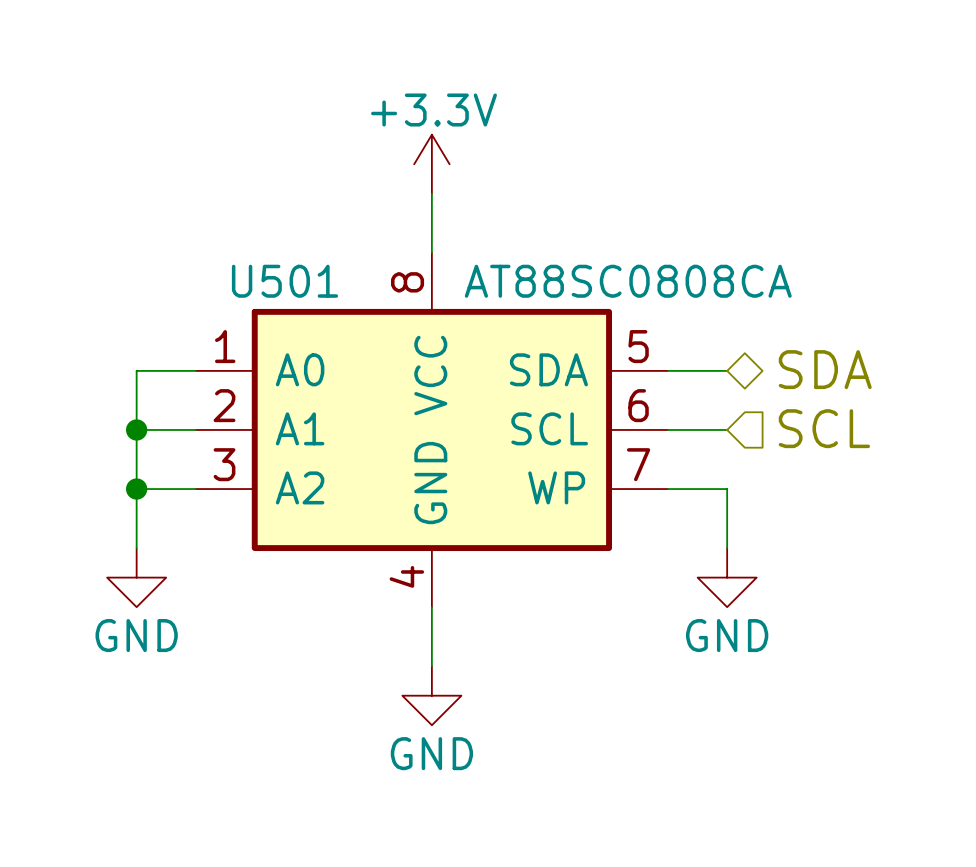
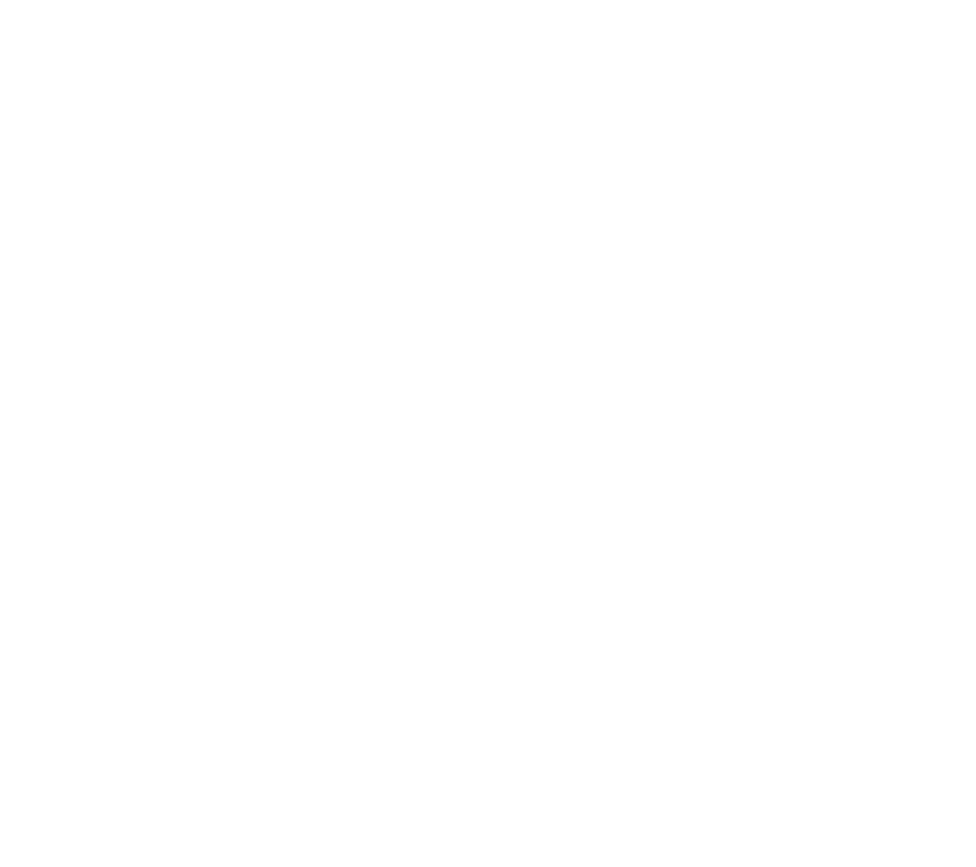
power symbol: +3.3V (431, 164) -> none
wire: (431, 193) (431, 252) -> none
hierarchical label: SDA (825, 369) -> none
wire: (195, 370) (136, 370) (136, 548) -> none
wire: (668, 370) (727, 370) -> none
hierarchical label: SCL (824, 428) -> none
wire: (136, 429) (195, 429) -> none
junction: (136, 429) -> none
U501: AT88SC0808CA (431, 429) -> none
wire: (668, 429) (727, 429) -> none
wire: (136, 489) (195, 489) -> none
junction: (136, 489) -> none
wire: (668, 489) (727, 489) (727, 548) -> none
power symbol: GND (136, 577) -> none
power symbol: GND (727, 577) -> none
wire: (431, 607) (431, 666) -> none
power symbol: GND (431, 695) -> none

